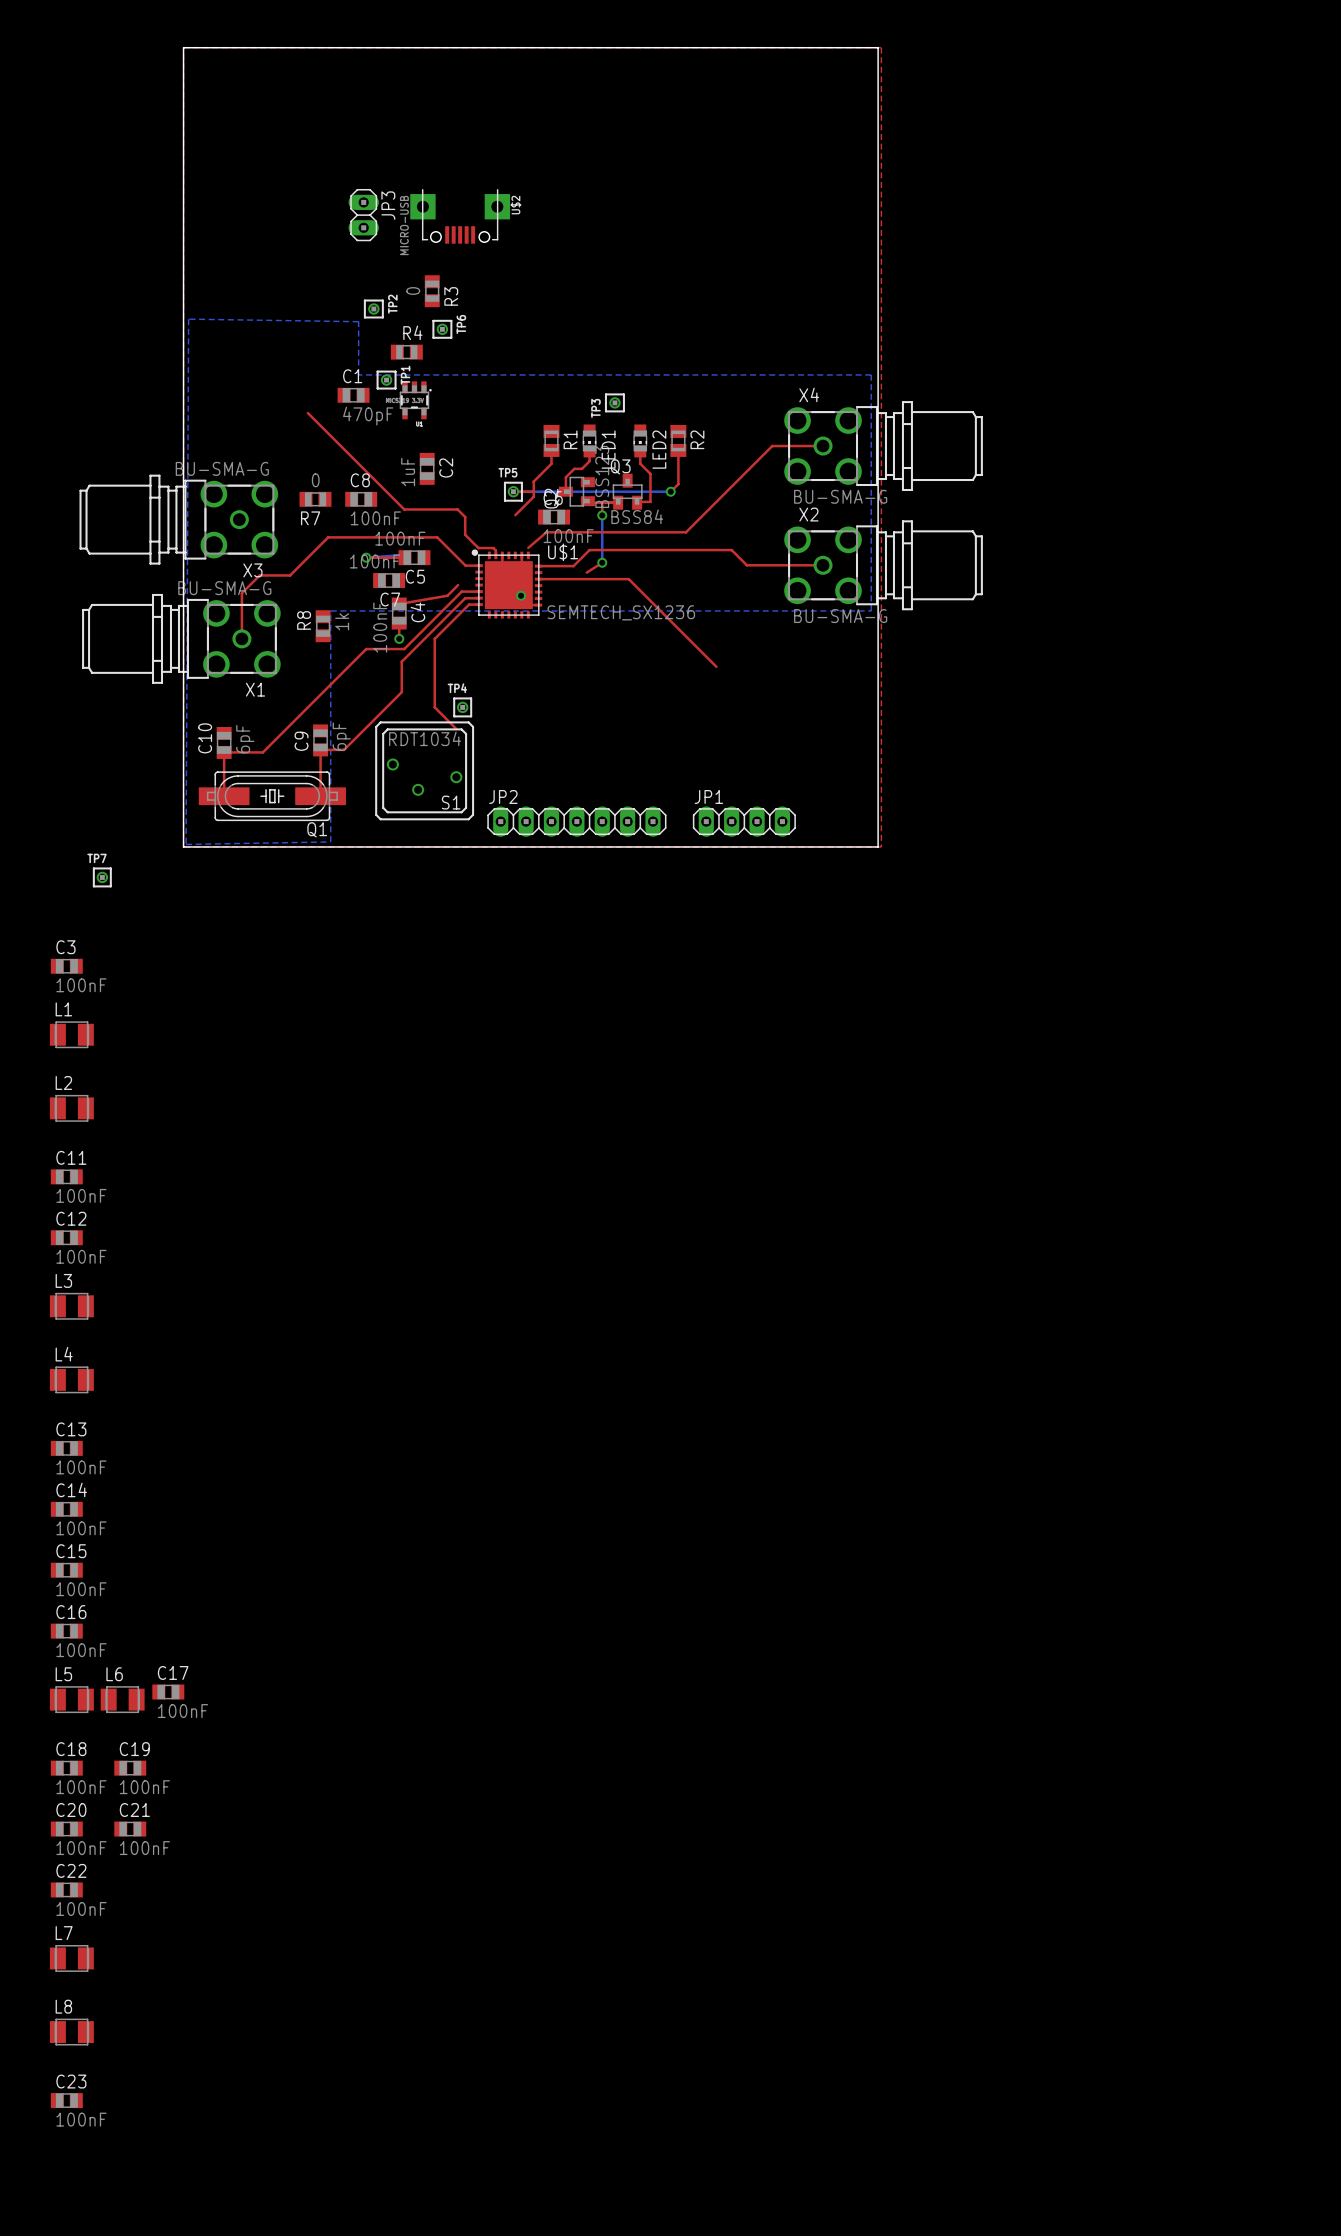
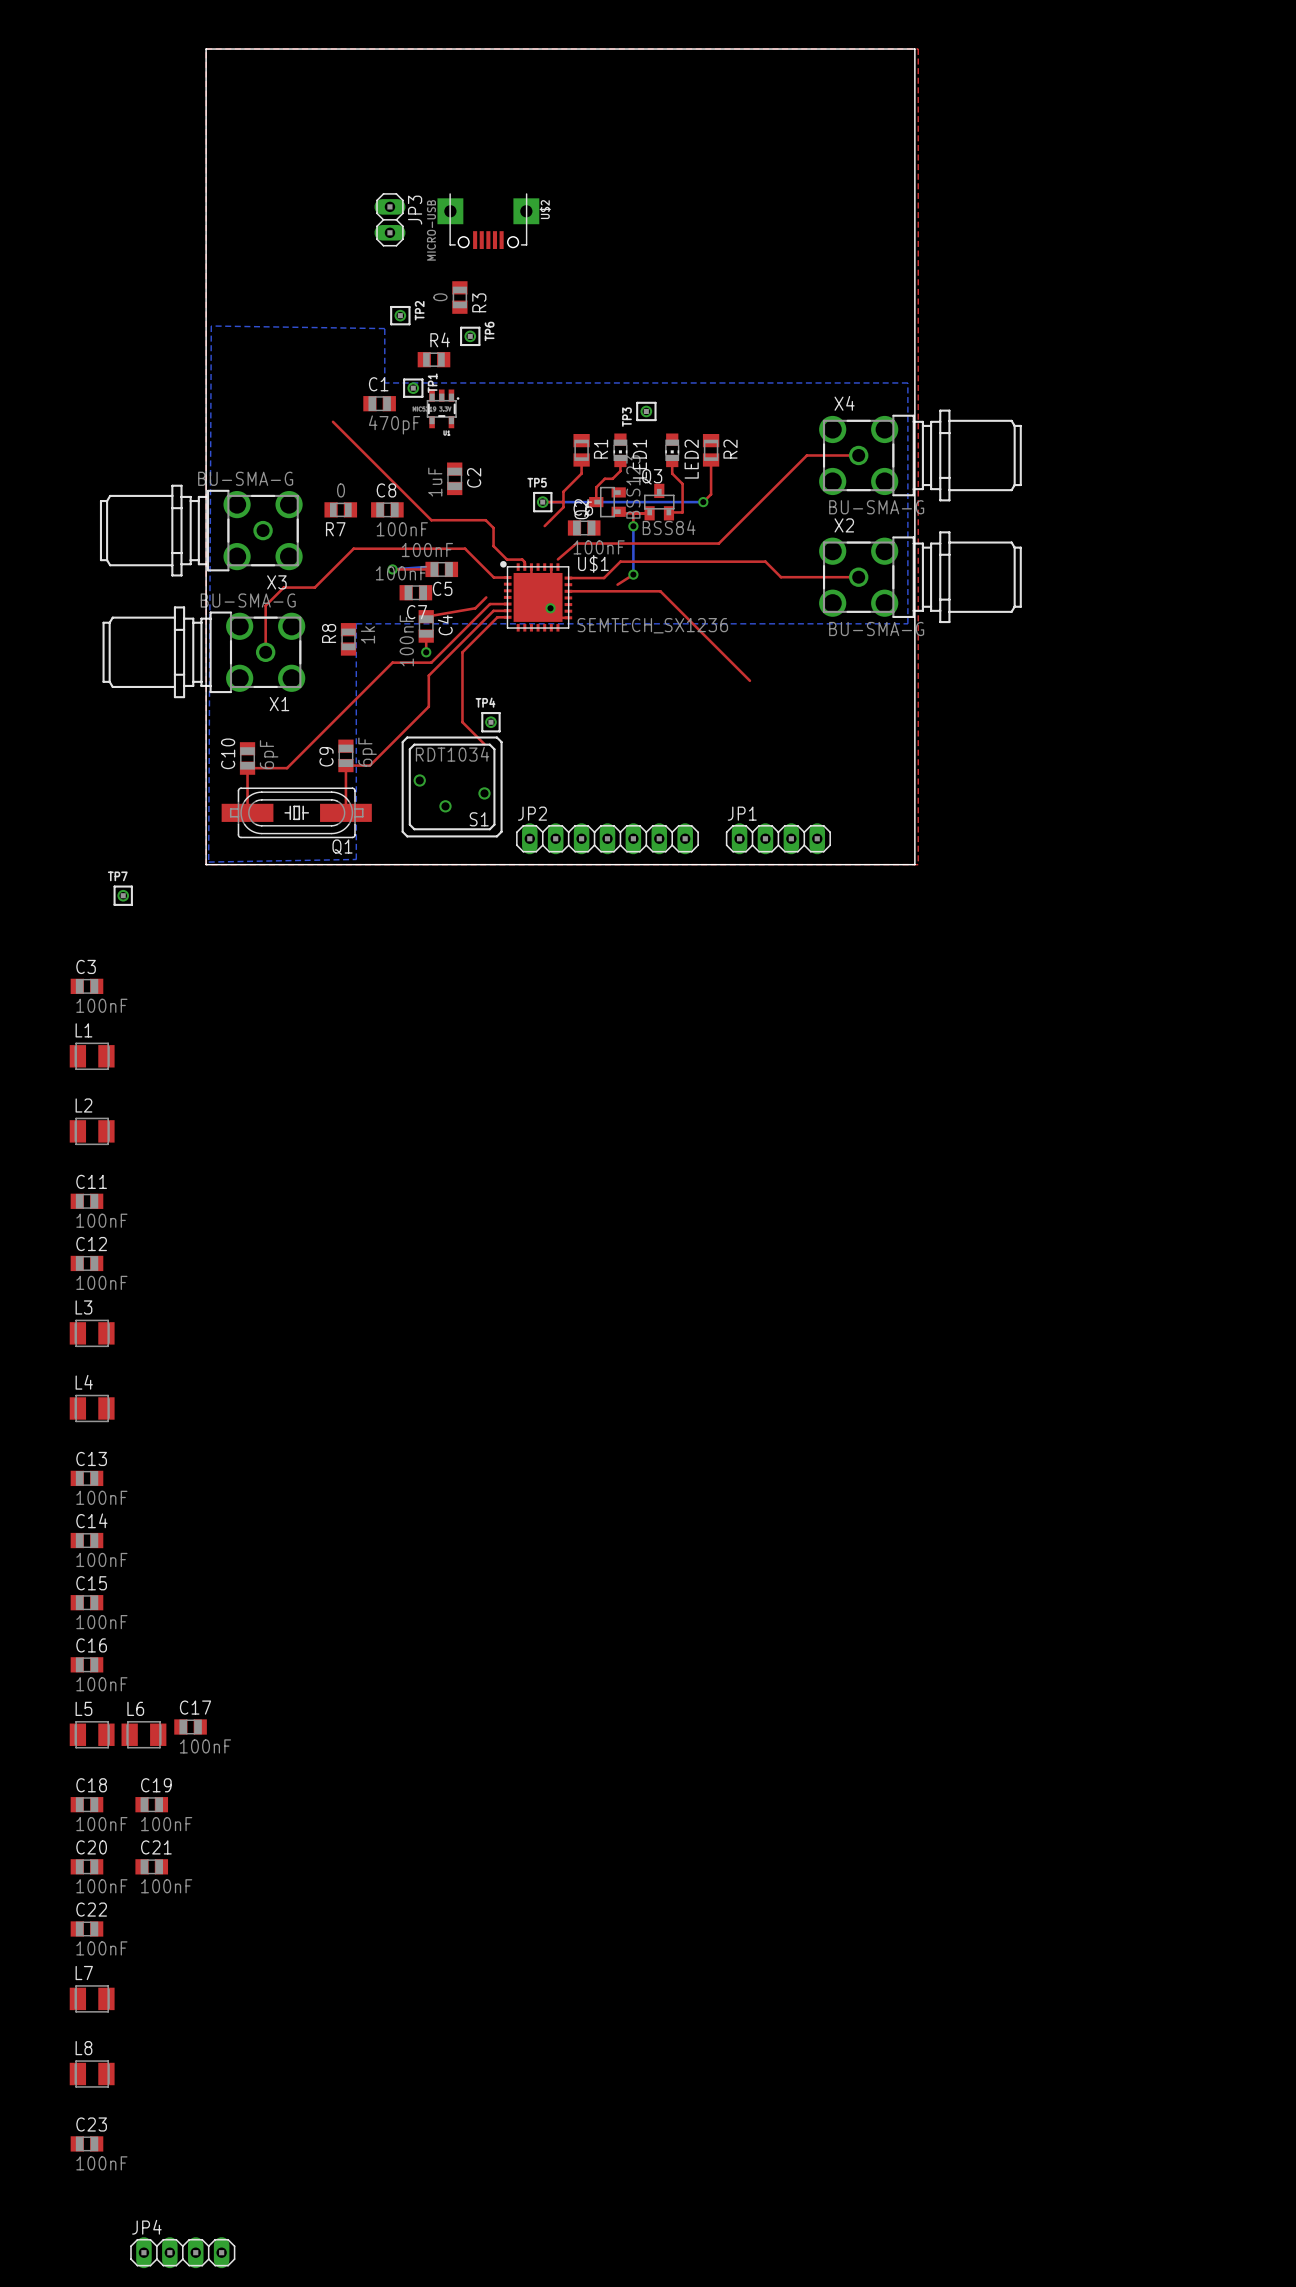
JP4: none -> (182, 2252)

